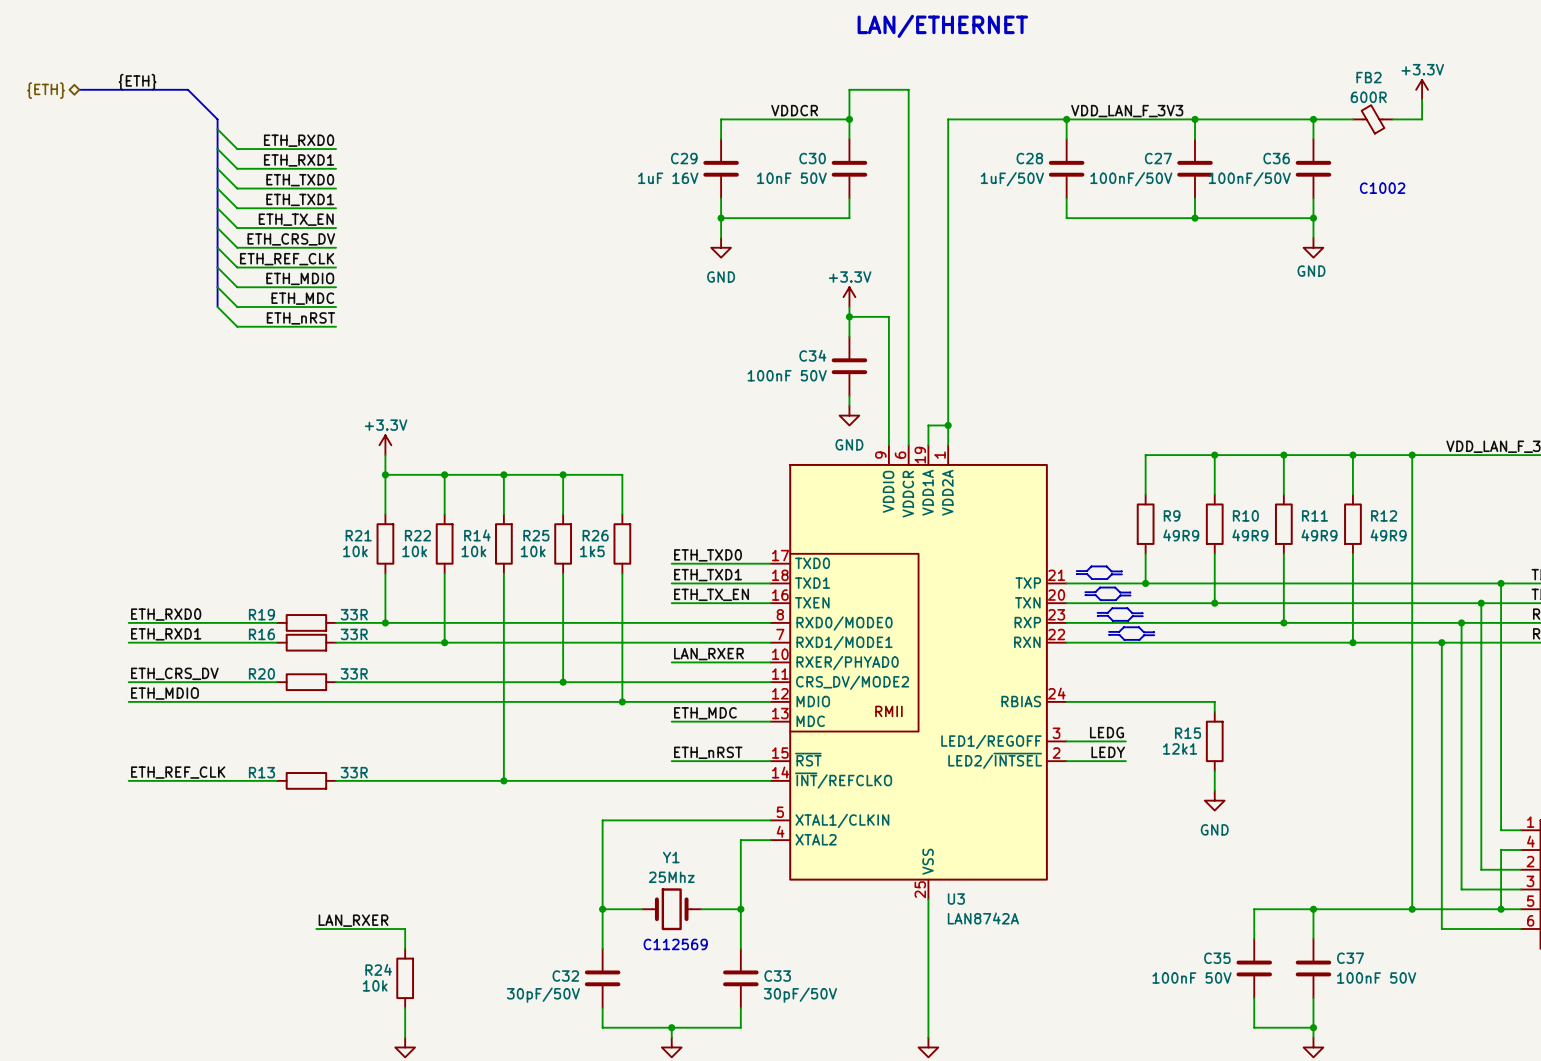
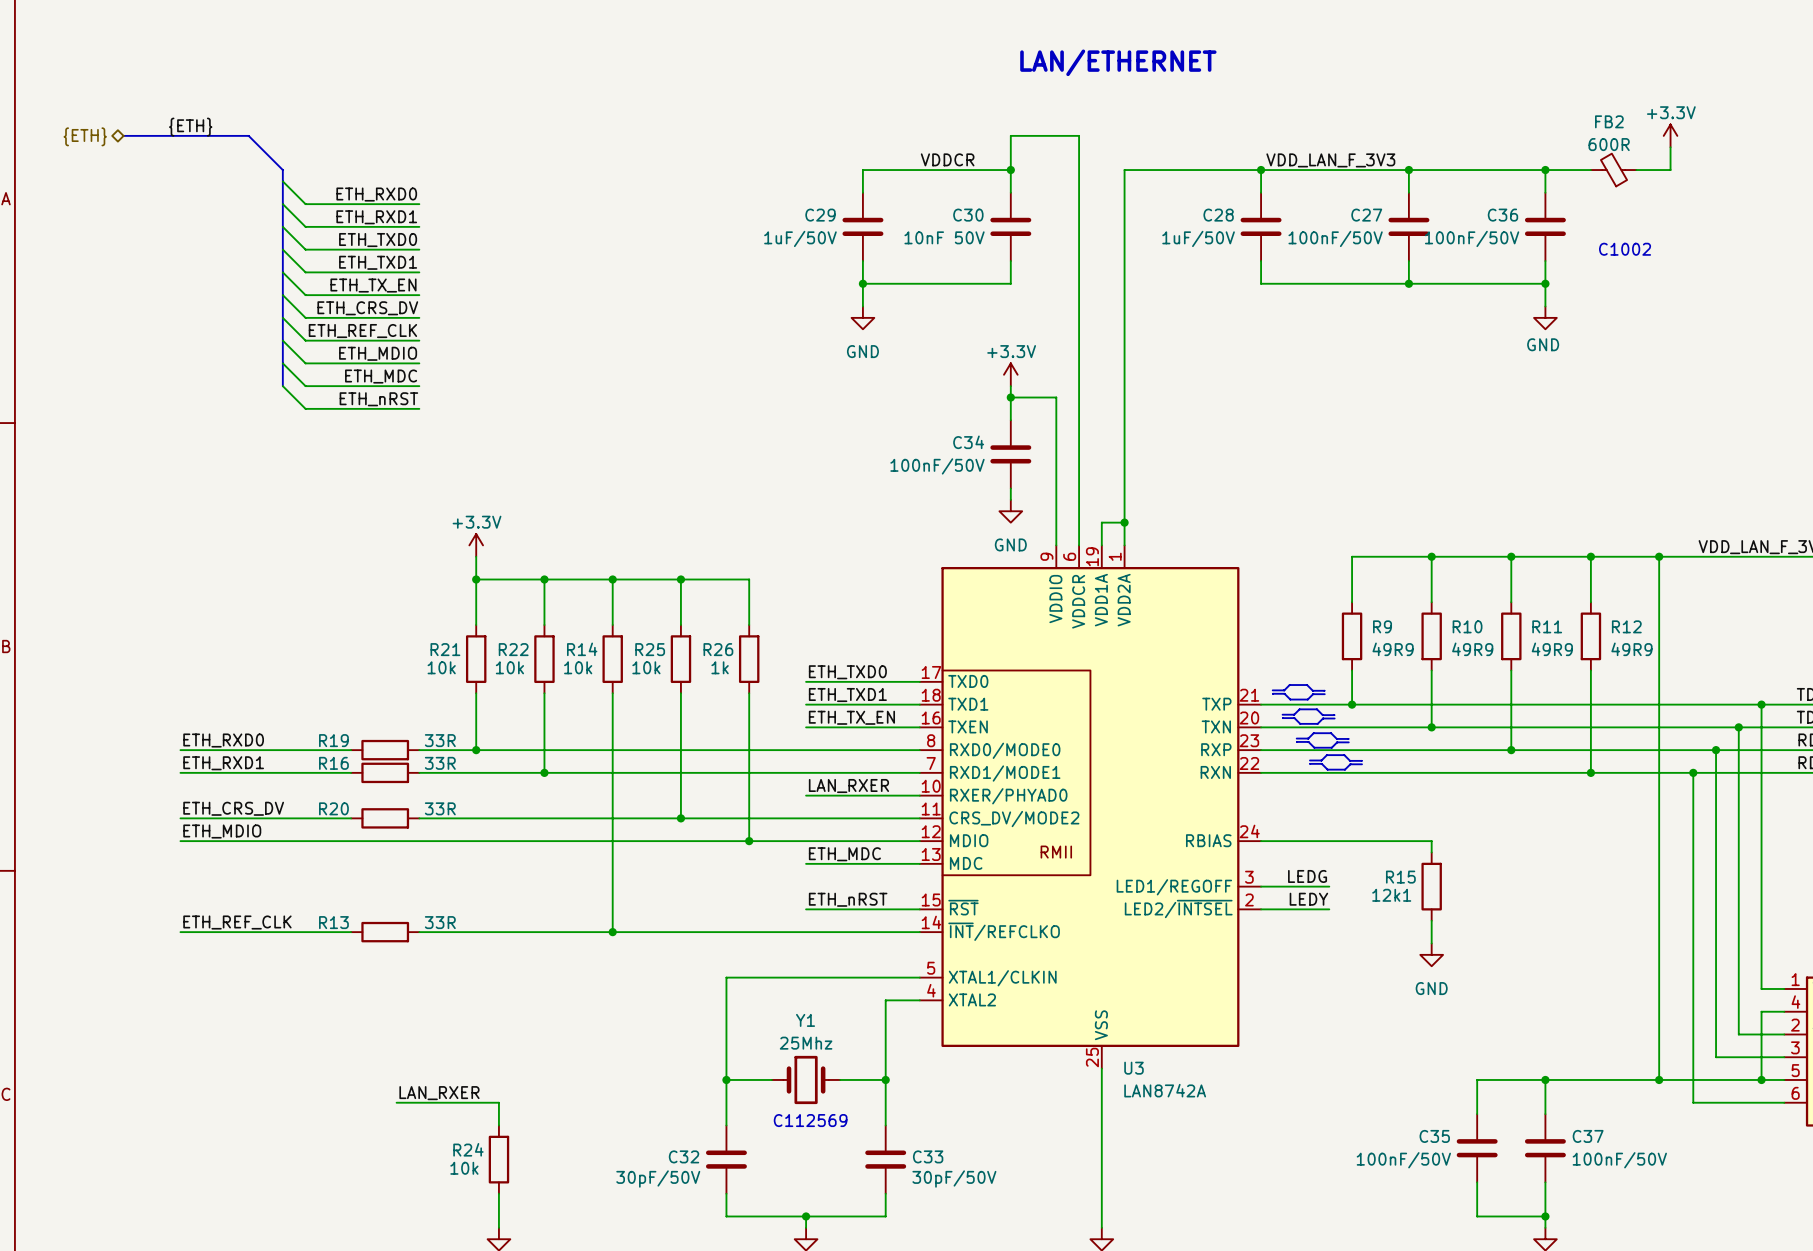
C29 value: 1uF 16V (668, 178) -> 1uF/50V (800, 238)
C34 value: 100nF 50V (787, 375) -> 100nF/50V (937, 466)
R26 value: 1k5 (592, 551) -> 1k (720, 667)
C35 value: 100nF 50V (1192, 977) -> 100nF/50V (1403, 1160)
C37 value: 100nF 50V (1376, 977) -> 100nF/50V (1619, 1160)

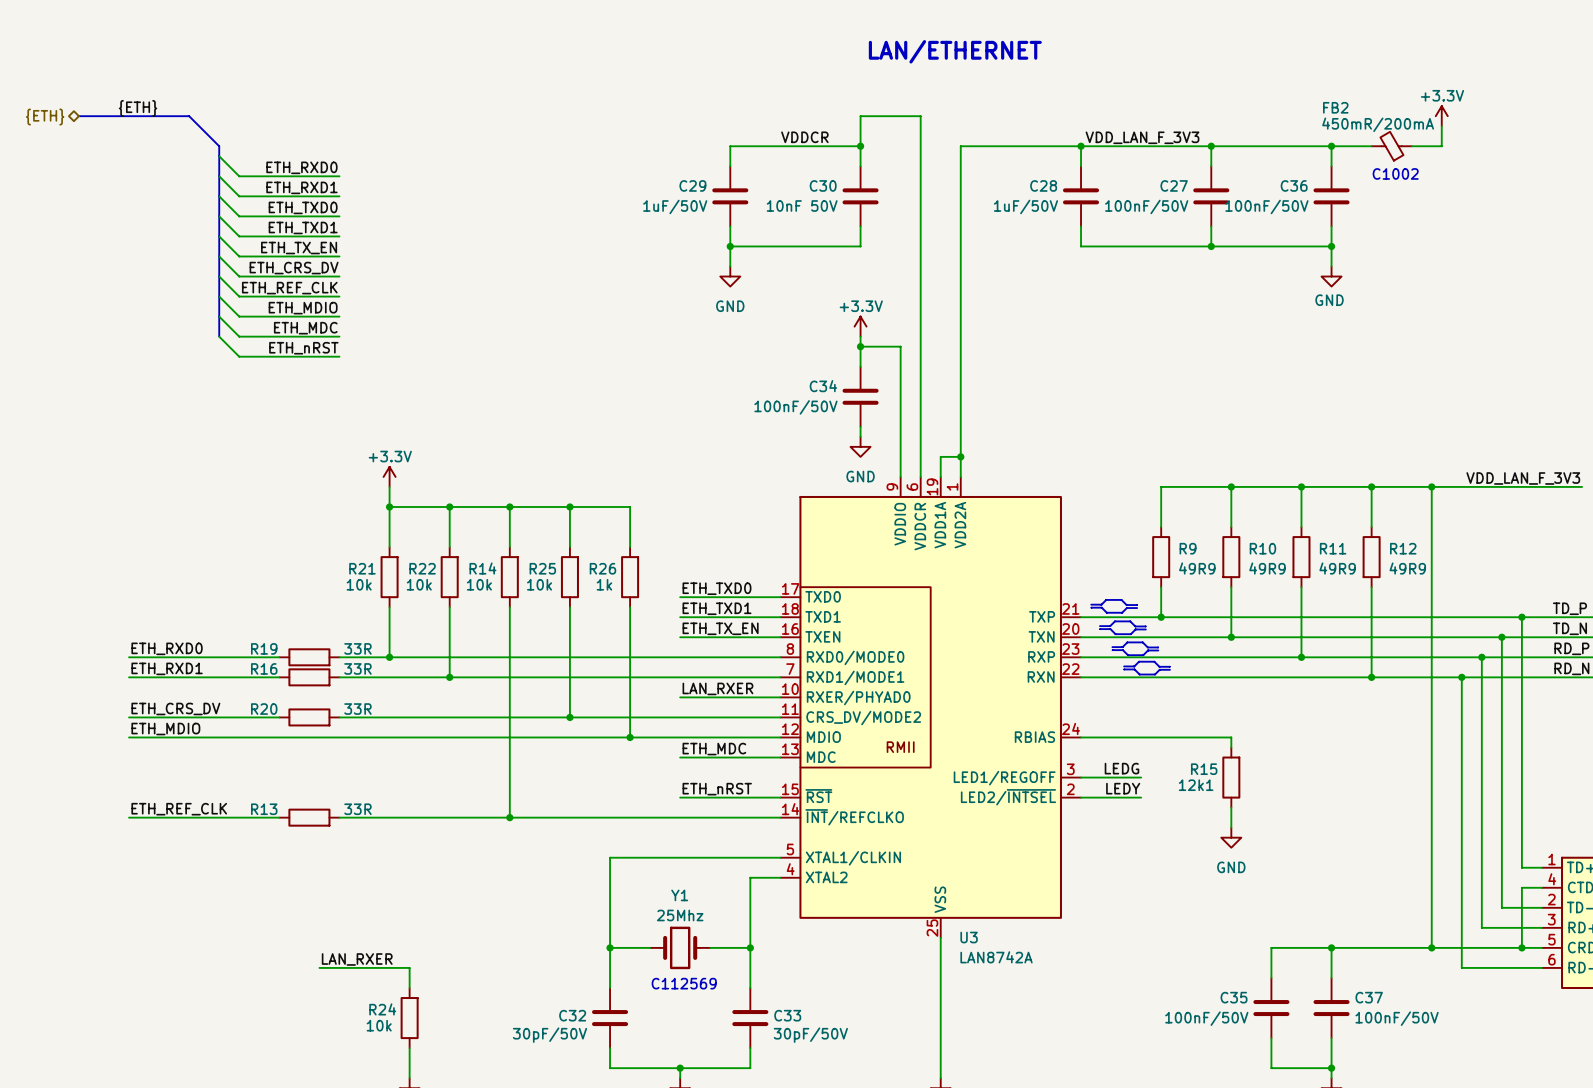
FB2 name position: FB2 (1609, 121) -> FB2 (1335, 107)
FB2 value: 600R (1609, 144) -> 450mR/200mA (1378, 124)
text position: C1002 (1625, 249) -> C1002 (1395, 173)

